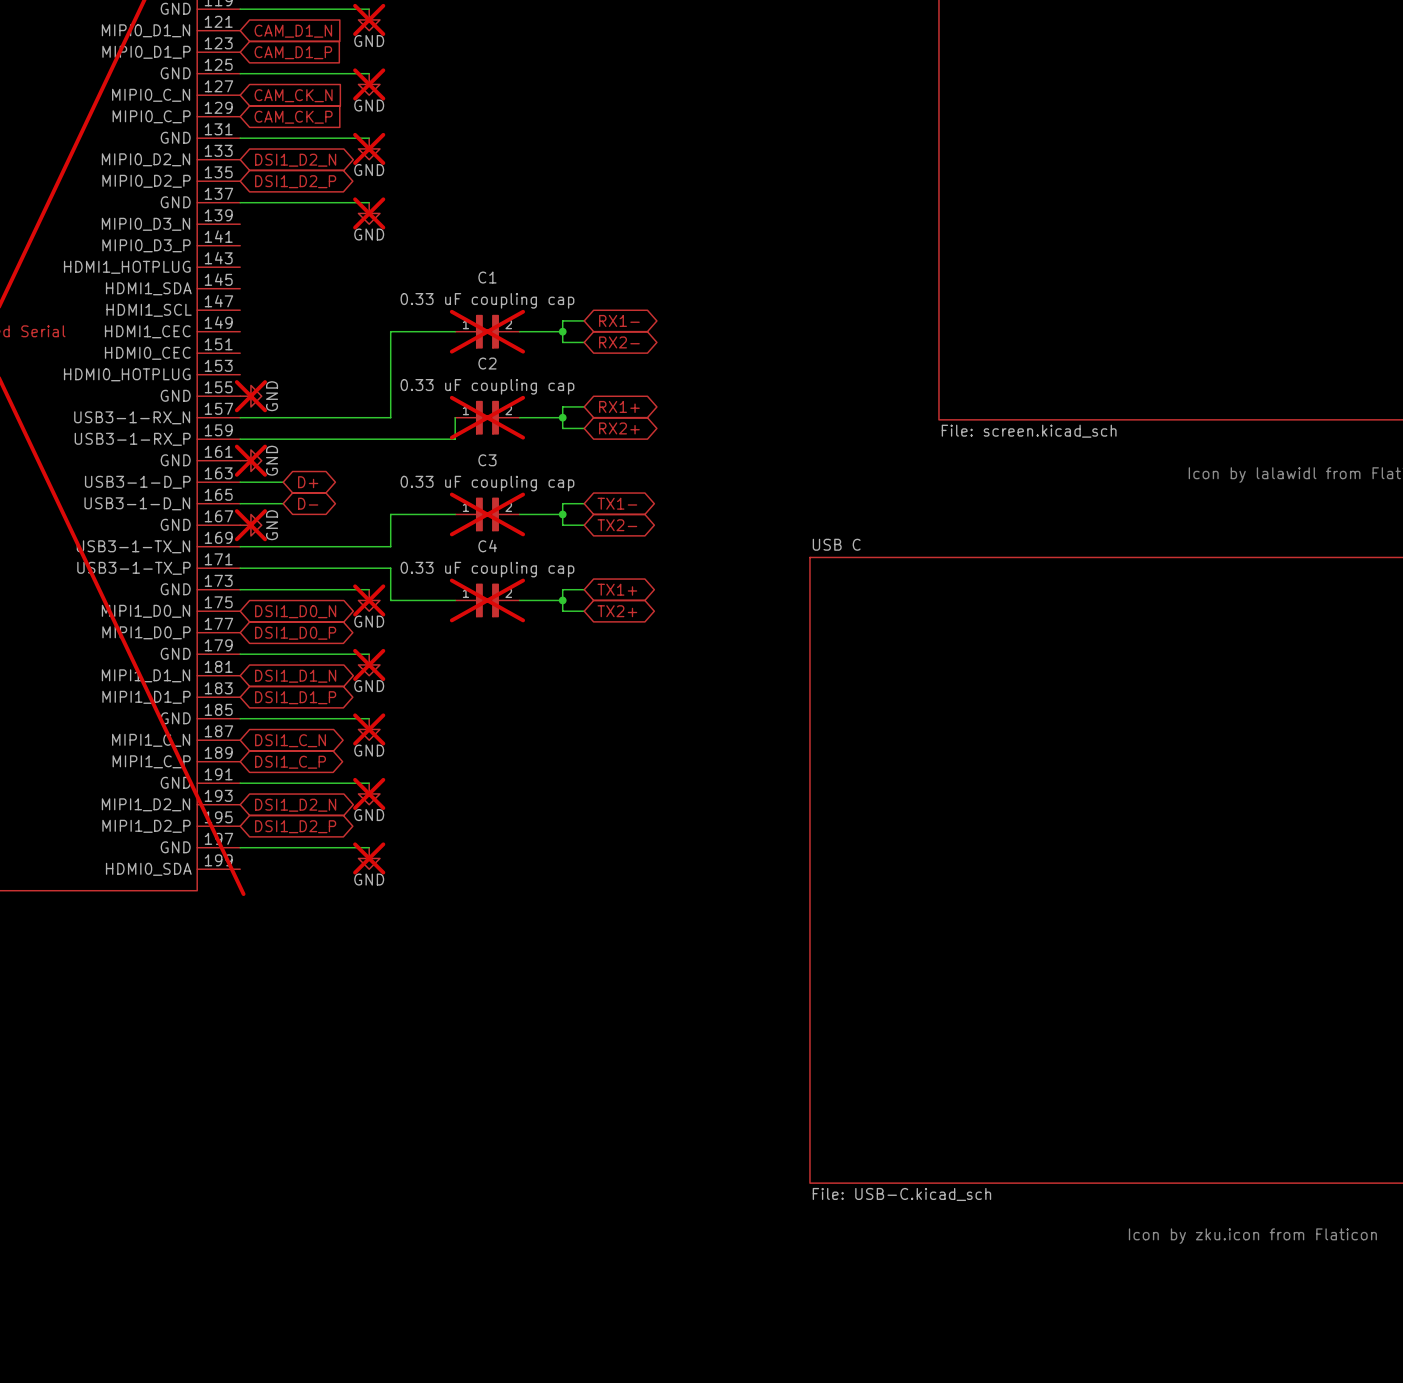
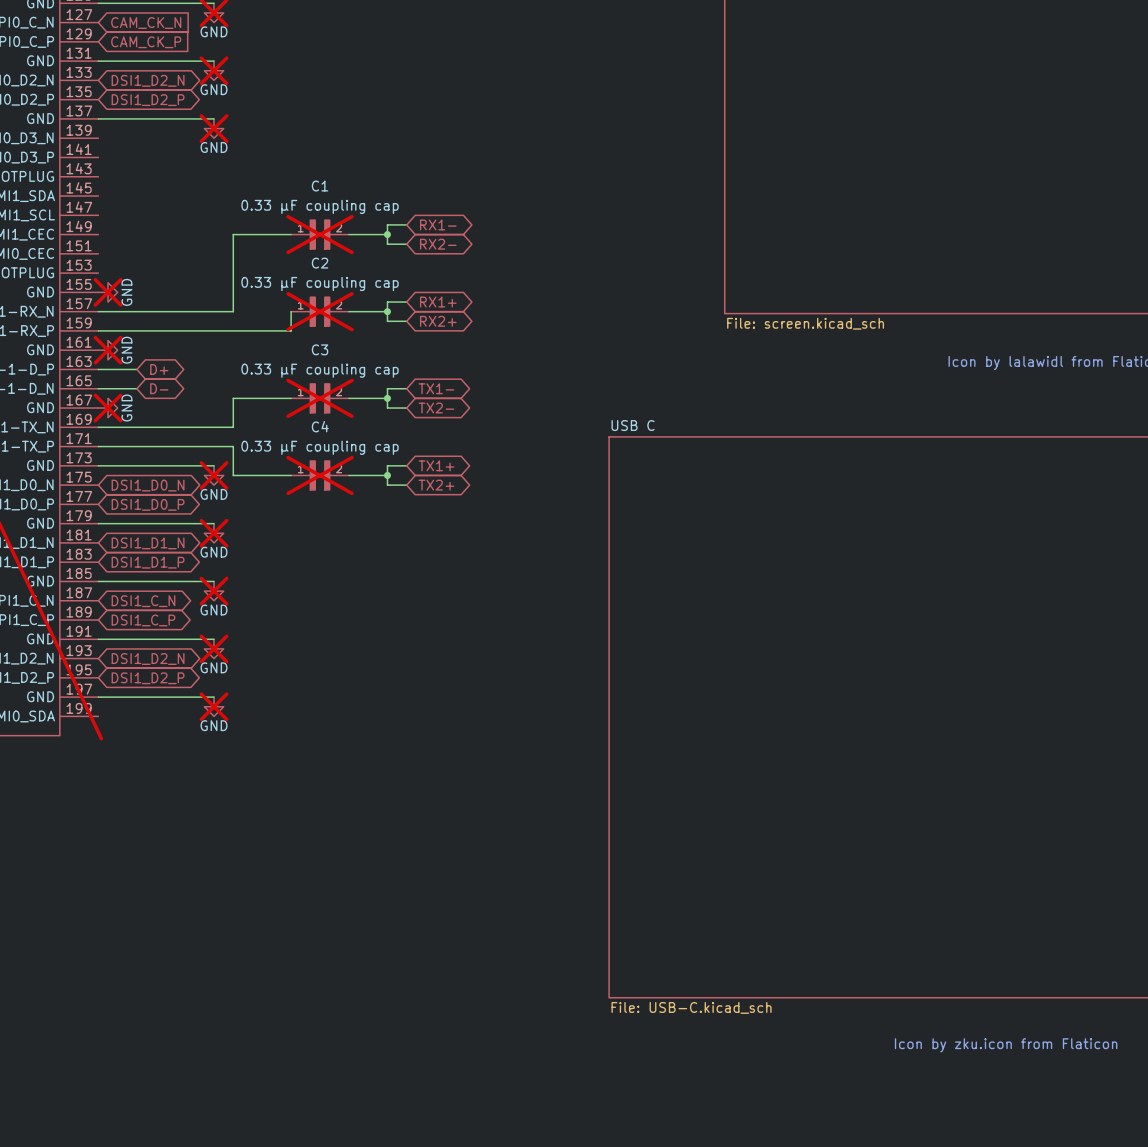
C1 value: 0.33 uF coupling cap (487, 300) -> 0.33 µF coupling cap (320, 206)
C2 value: 0.33 uF coupling cap (487, 386) -> 0.33 µF coupling cap (320, 283)
C3 value: 0.33 uF coupling cap (487, 483) -> 0.33 µF coupling cap (320, 370)
C4 value: 0.33 uF coupling cap (487, 569) -> 0.33 µF coupling cap (320, 447)

